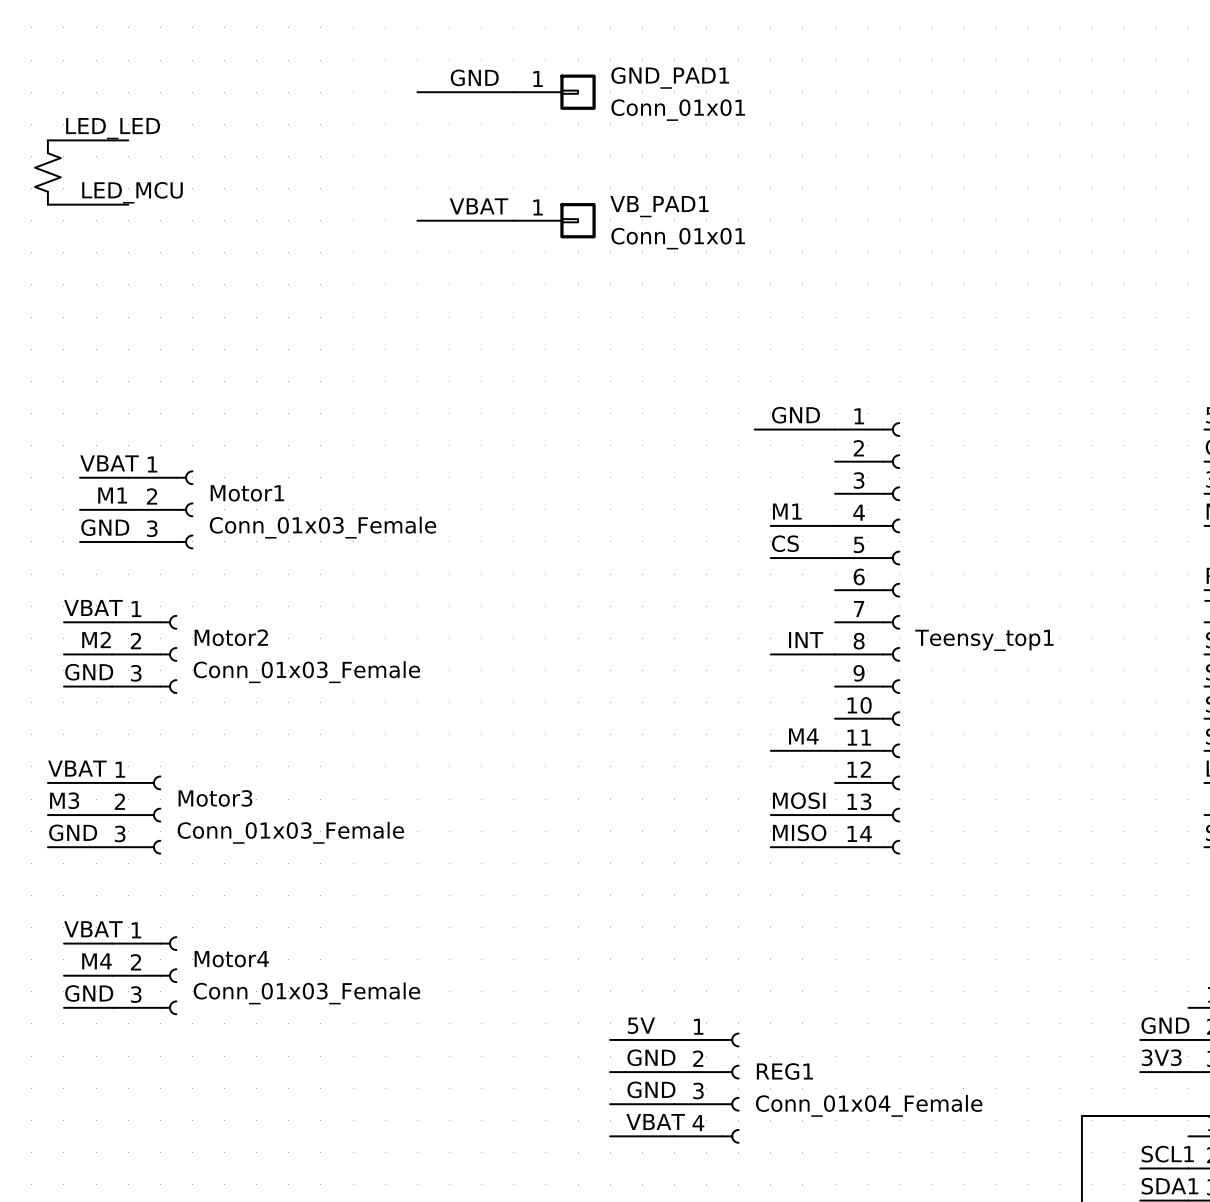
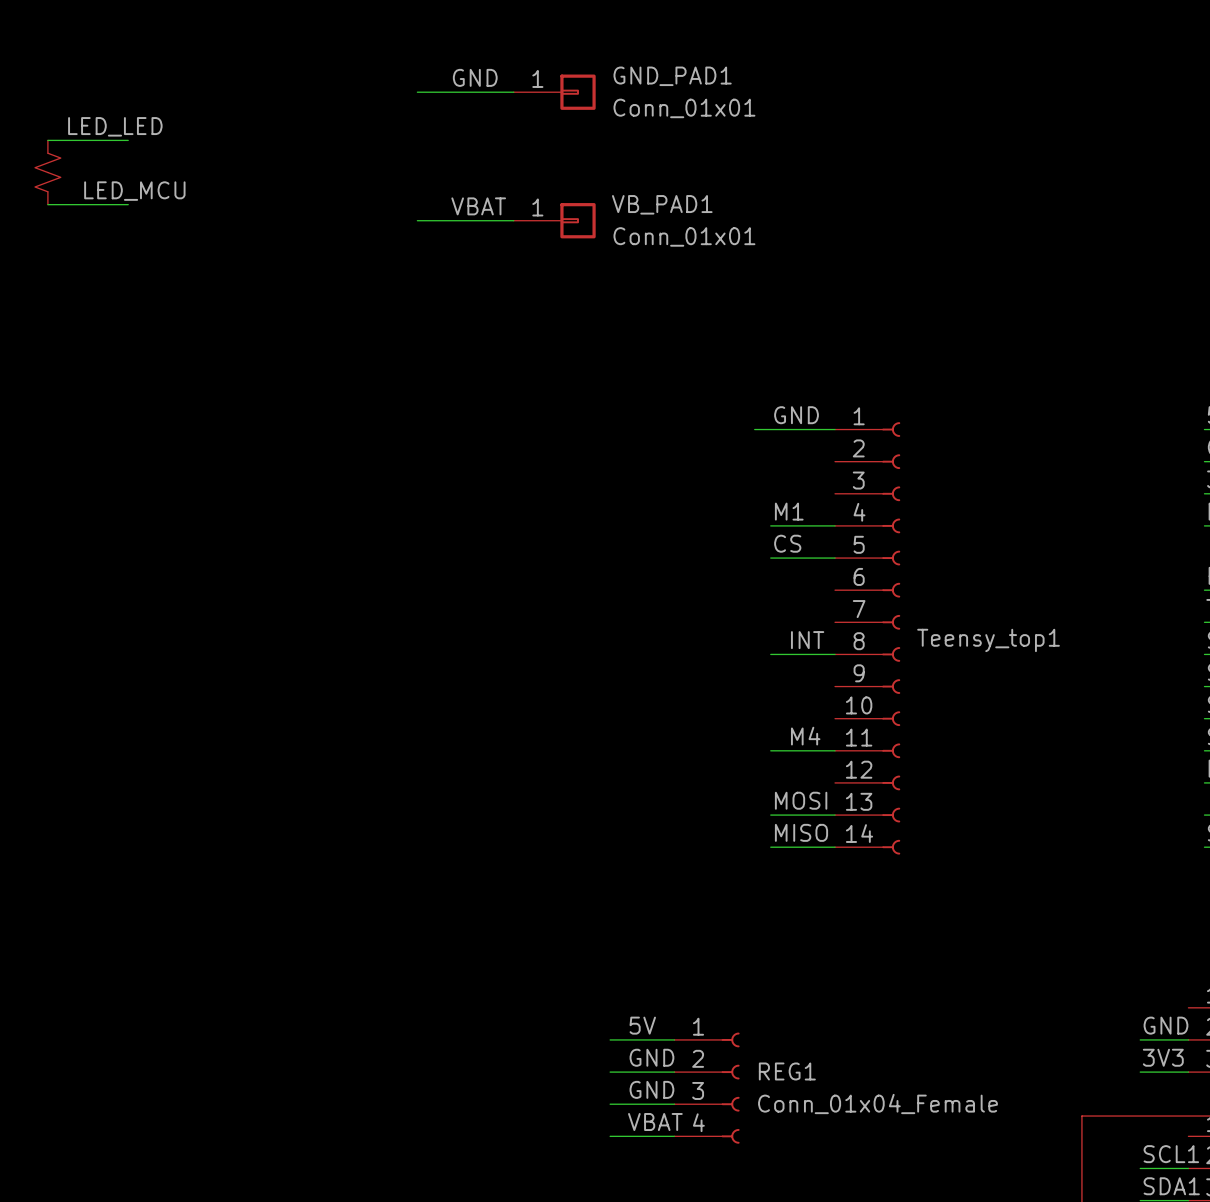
label: VBAT (109, 463) -> none
wire: (80, 477) (128, 477) -> none
label: M1 (112, 495) -> none
wire: (80, 509) (128, 509) -> none
Motor1: Conn_01x03_Female (160, 509) -> none
label: GND (105, 527) -> none
wire: (80, 541) (128, 541) -> none
label: VBAT (93, 607) -> none
wire: (63, 622) (112, 622) -> none
label: M2 (96, 639) -> none
wire: (63, 654) (112, 654) -> none
Motor2: Conn_01x03_Female (144, 654) -> none
label: GND (89, 672) -> none
wire: (63, 686) (112, 686) -> none
label: VBAT (77, 768) -> none
wire: (47, 782) (96, 782) -> none
label: M3 (64, 800) -> none
wire: (47, 815) (96, 815) -> none
Motor3: Conn_01x03_Female (128, 815) -> none
label: GND (73, 832) -> none
wire: (47, 847) (96, 847) -> none
label: VBAT (93, 929) -> none
wire: (63, 943) (112, 943) -> none
label: M4 (97, 961) -> none
wire: (63, 975) (112, 975) -> none
Motor4: Conn_01x03_Female (144, 975) -> none
label: GND (89, 993) -> none
wire: (63, 1007) (112, 1007) -> none

